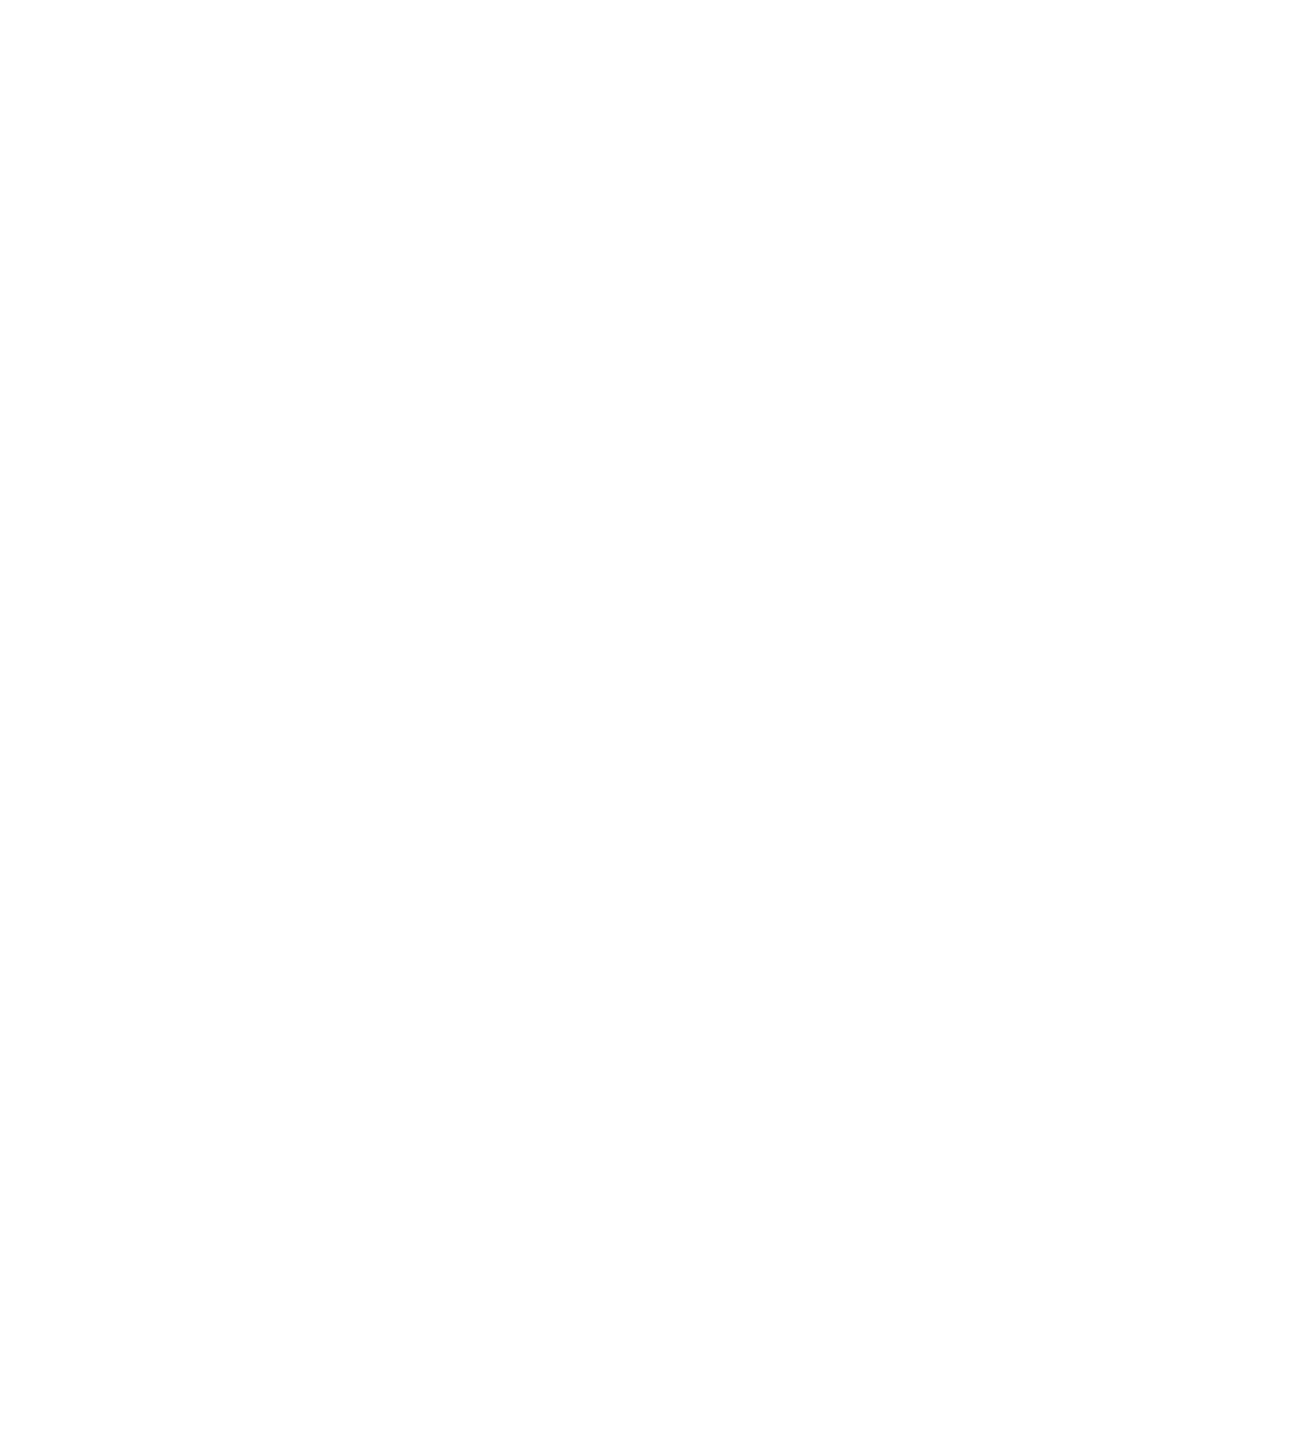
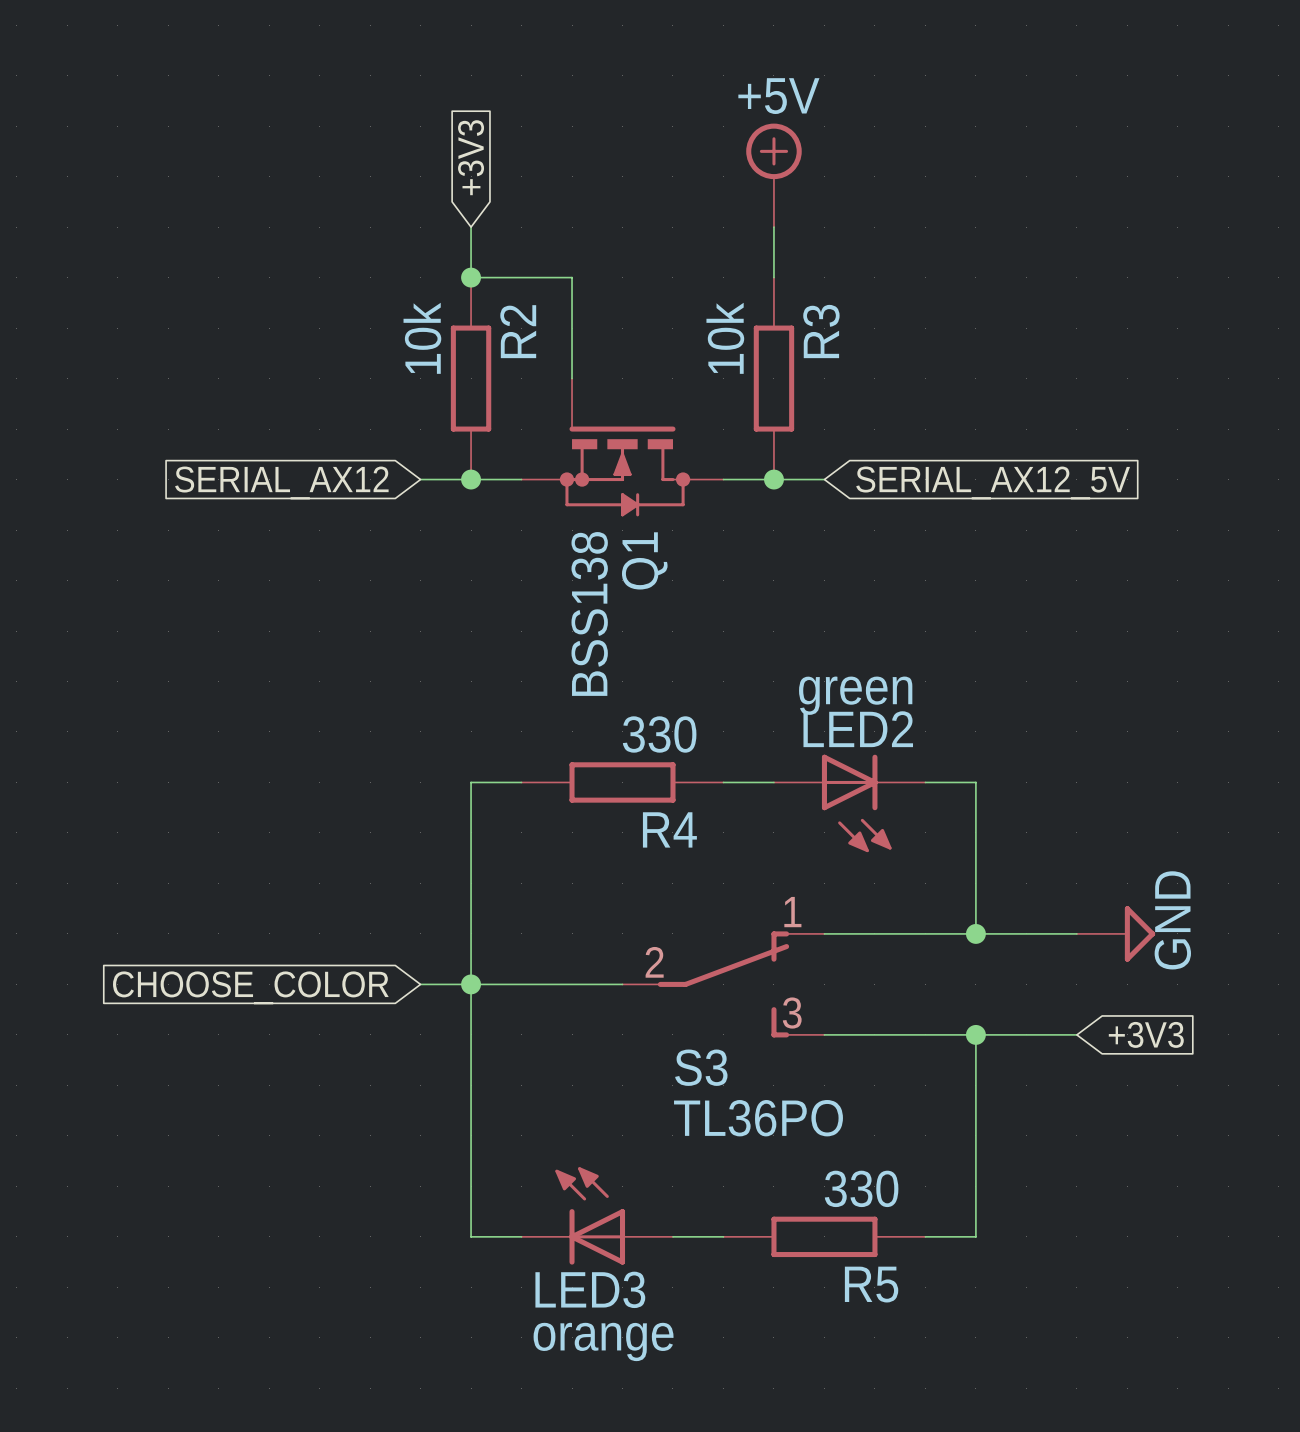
global label: none -> +3V3 (471, 157)
power symbol: none -> +5V (773, 175)
wire: none -> (471, 227) (471, 277) (572, 277) (572, 378)
wire: none -> (773, 227) (773, 277)
junction: none -> (471, 277)
R2: none -> 10k (471, 378)
R3: none -> 10k (773, 378)
Q1: none -> BSS138 (622, 447)
wire: none -> (420, 479) (521, 479)
junction: none -> (471, 479)
wire: none -> (723, 479) (824, 479)
junction: none -> (773, 479)
global label: none -> SERIAL_AX12 (281, 483)
global label: none -> SERIAL_AX12_5V (993, 483)
wire: none -> (521, 782) (471, 782) (471, 1236) (521, 1236)
R4: none -> 330 (622, 782)
wire: none -> (723, 782) (773, 782)
wire: none -> (925, 782) (975, 782) (975, 933)
LED2: none -> green (849, 803)
wire: none -> (824, 933) (1076, 933)
junction: none -> (975, 933)
power symbol: none -> GND (1116, 933)
wire: none -> (420, 984) (622, 984)
junction: none -> (471, 984)
S3: none -> TL36PO (723, 984)
global label: none -> CHOOSE_COLOR (250, 987)
wire: none -> (824, 1034) (1076, 1034)
wire: none -> (975, 1034) (975, 1236) (925, 1236)
junction: none -> (975, 1034)
global label: none -> +3V3 (1146, 1034)
LED3: none -> orange (597, 1215)
wire: none -> (672, 1236) (723, 1236)
R5: none -> 330 (824, 1236)

